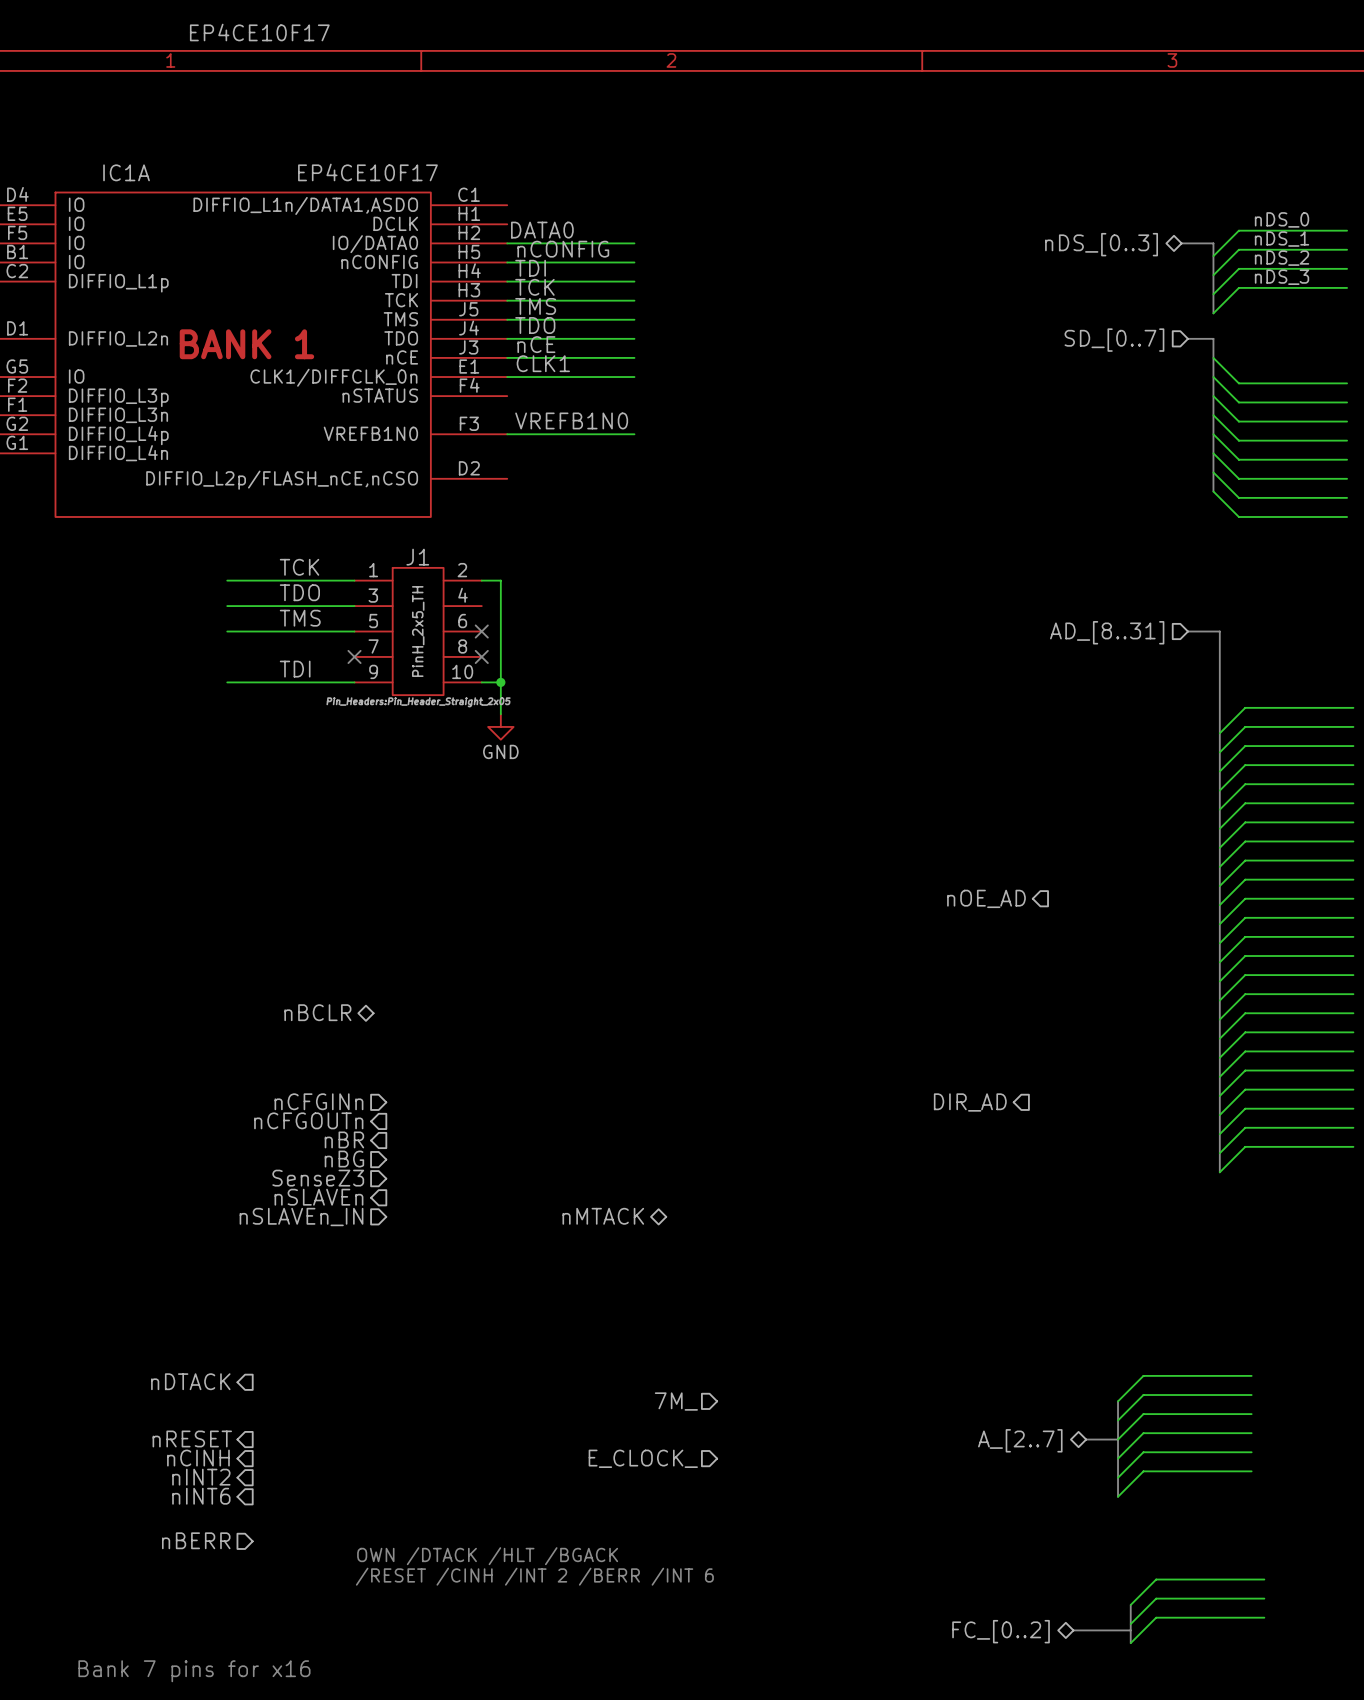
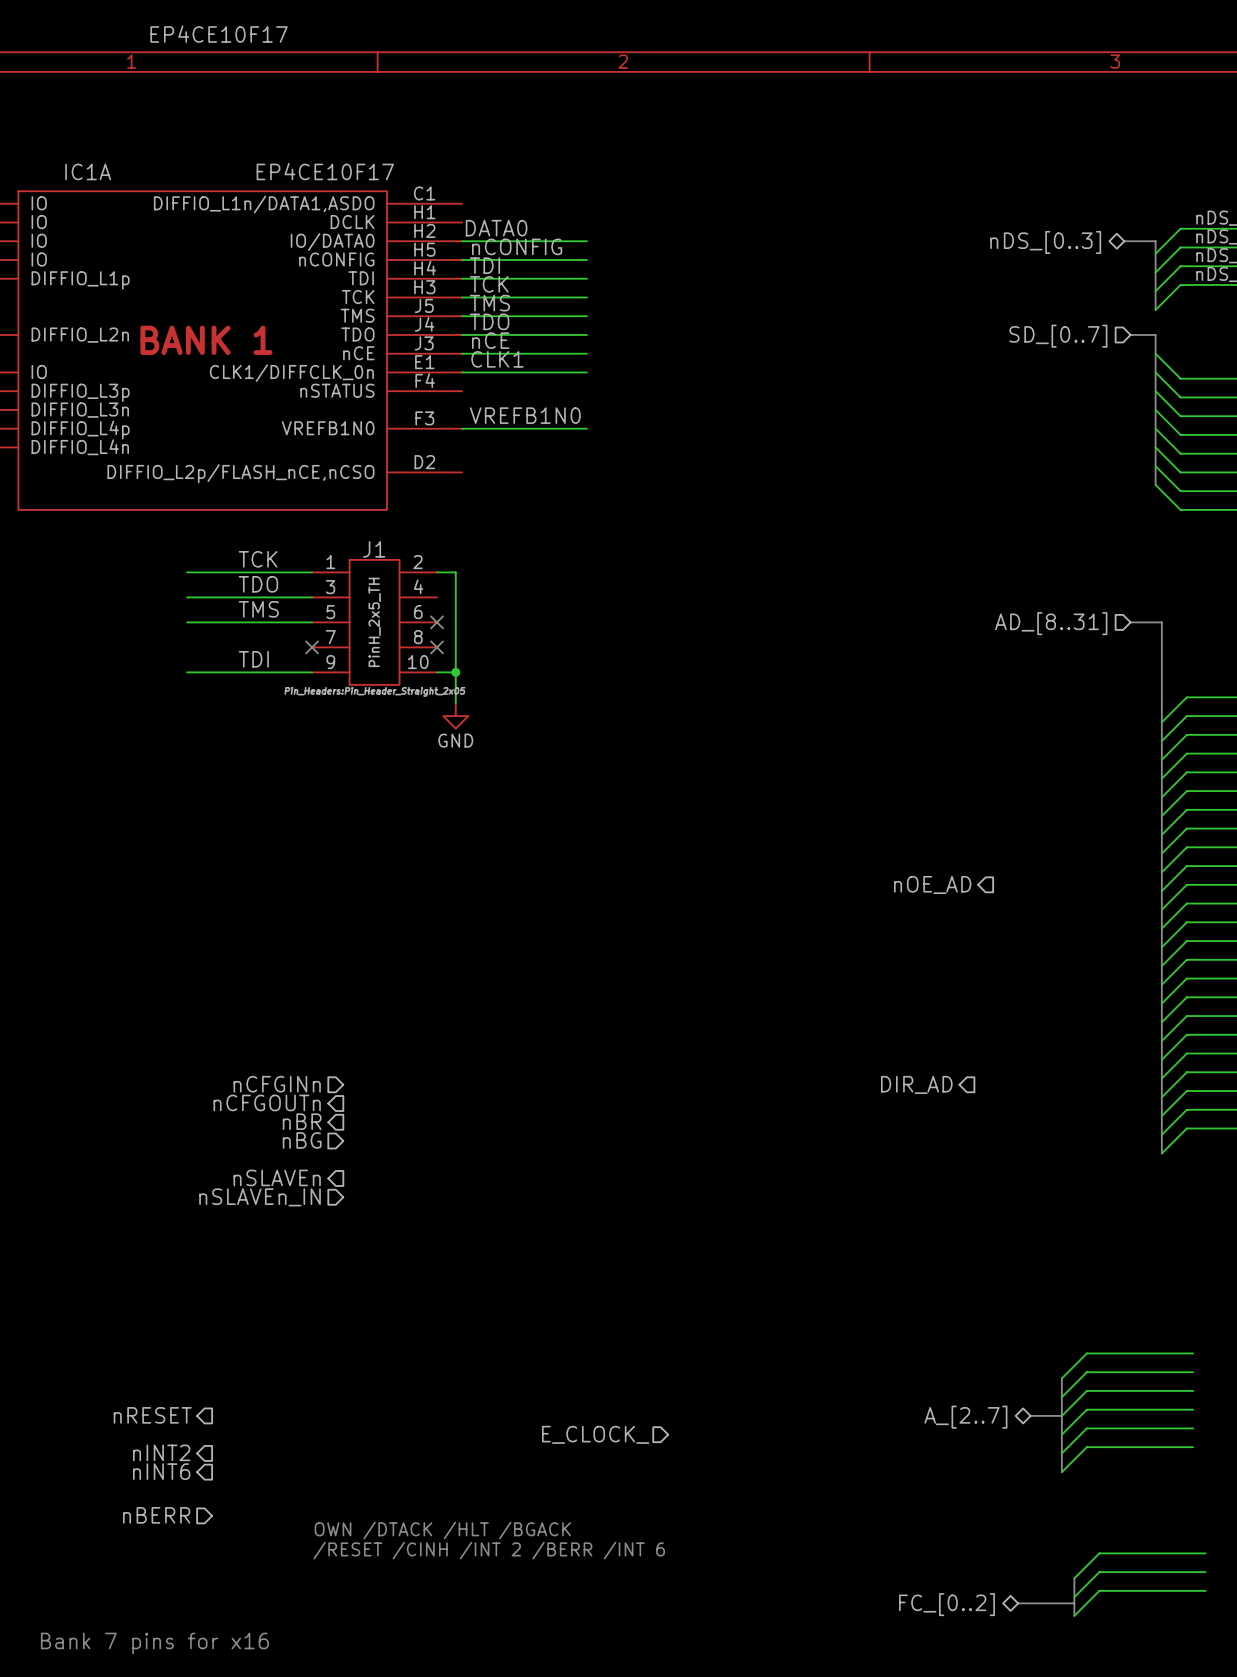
hierarchical label: nBCLR (317, 1012) -> none
hierarchical label: SenseZ3 (318, 1178) -> none
hierarchical label: nMTACK (603, 1216) -> none
hierarchical label: nDTACK (190, 1381) -> none
hierarchical label: 7M_ (676, 1401) -> none
hierarchical label: nCINH (198, 1458) -> none

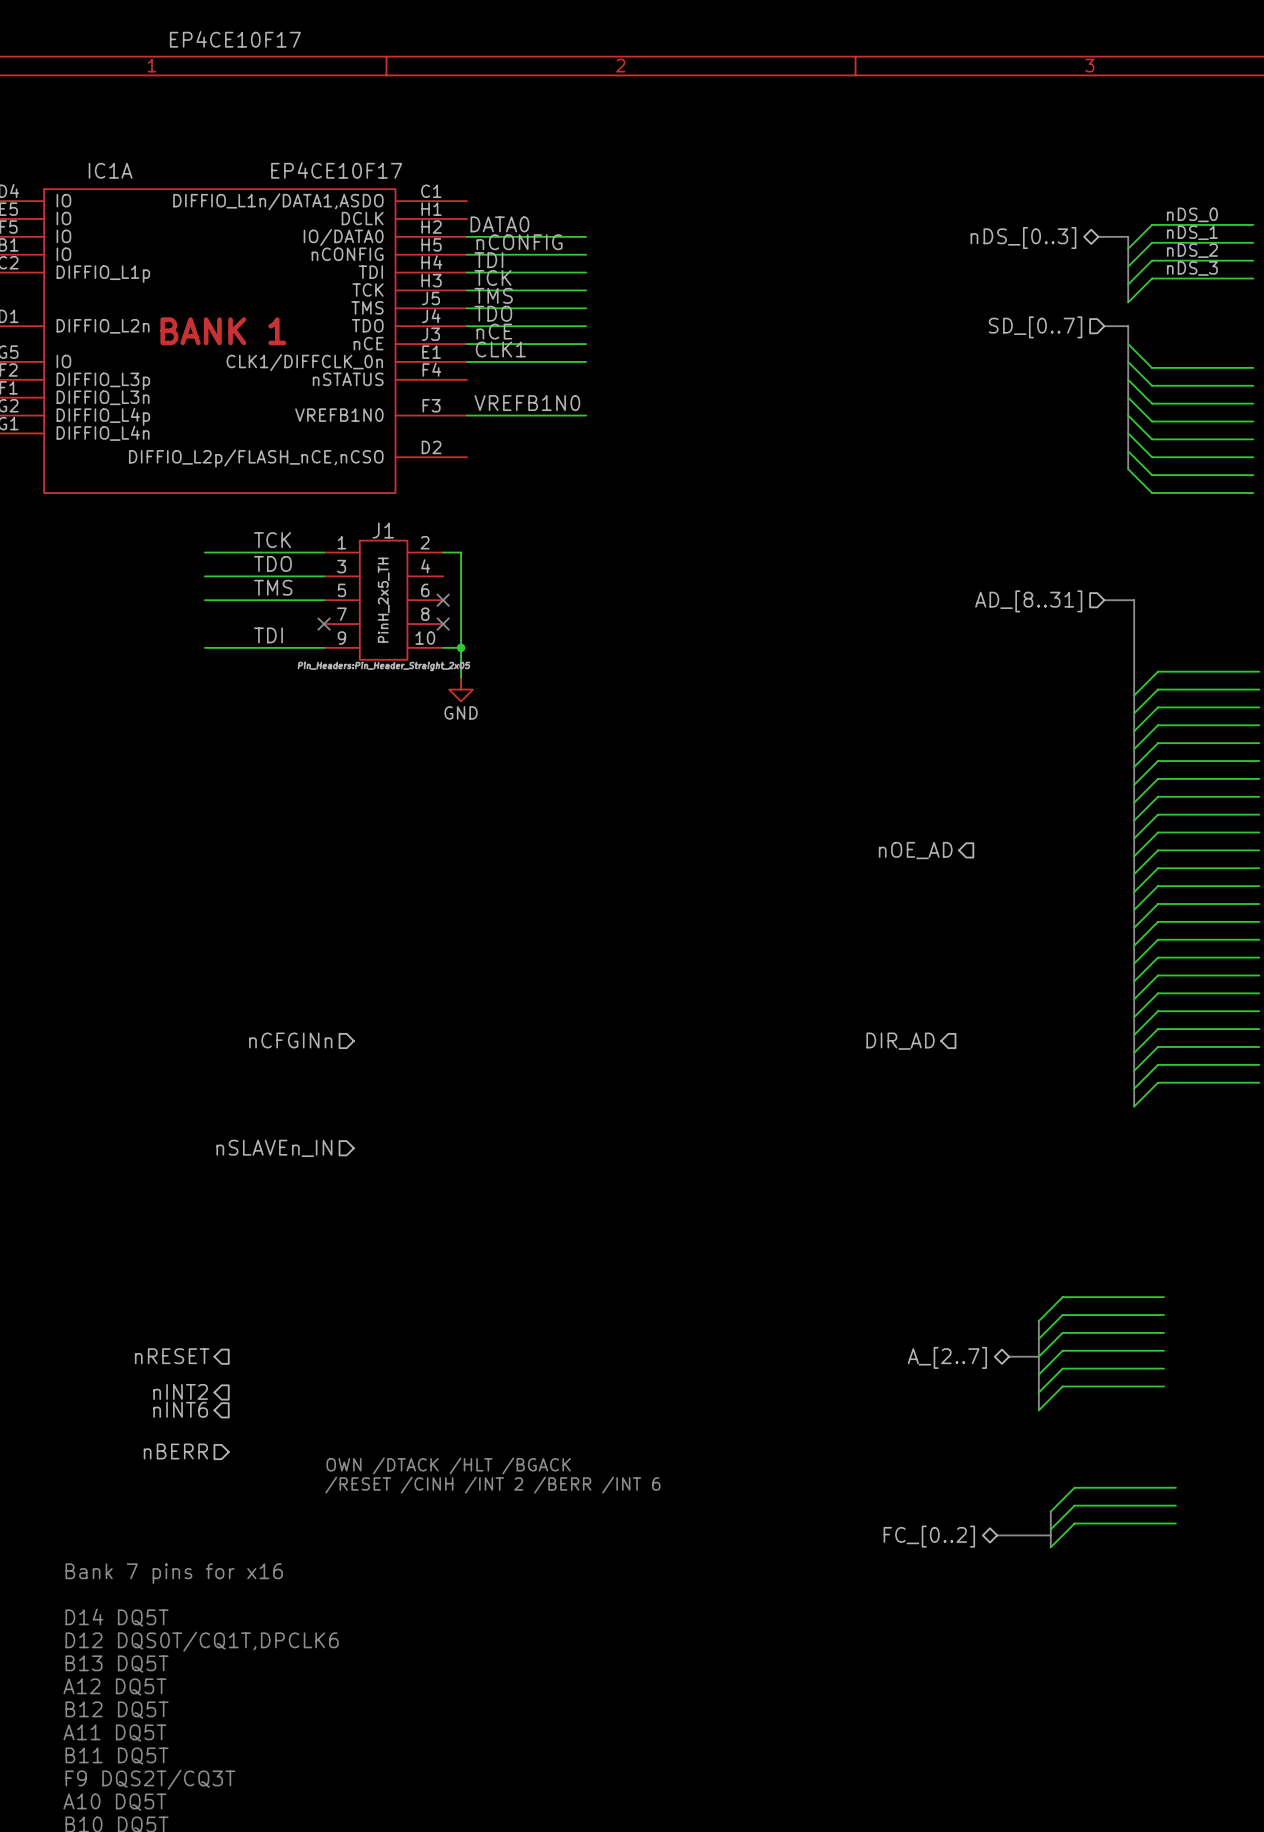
hierarchical label: nCFGOUTn (267, 1102) -> none
hierarchical label: nBR (302, 1121) -> none
hierarchical label: nBG (302, 1140) -> none
hierarchical label: nSLAVEn (277, 1177) -> none
hierarchical label: E_CLOCK_ (595, 1434) -> none

